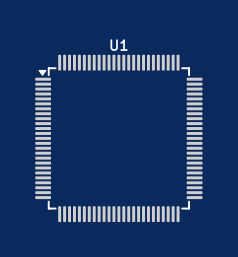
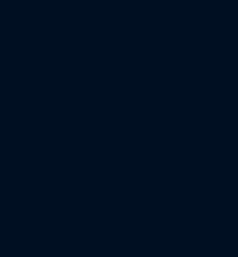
U1: (118, 138) -> none

